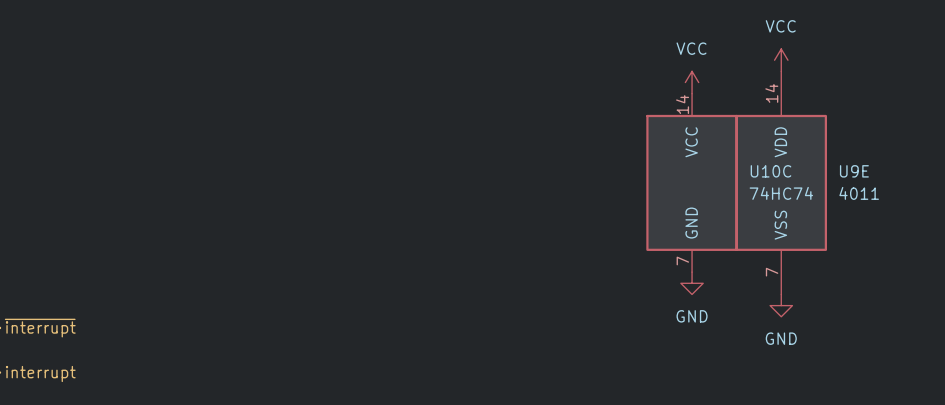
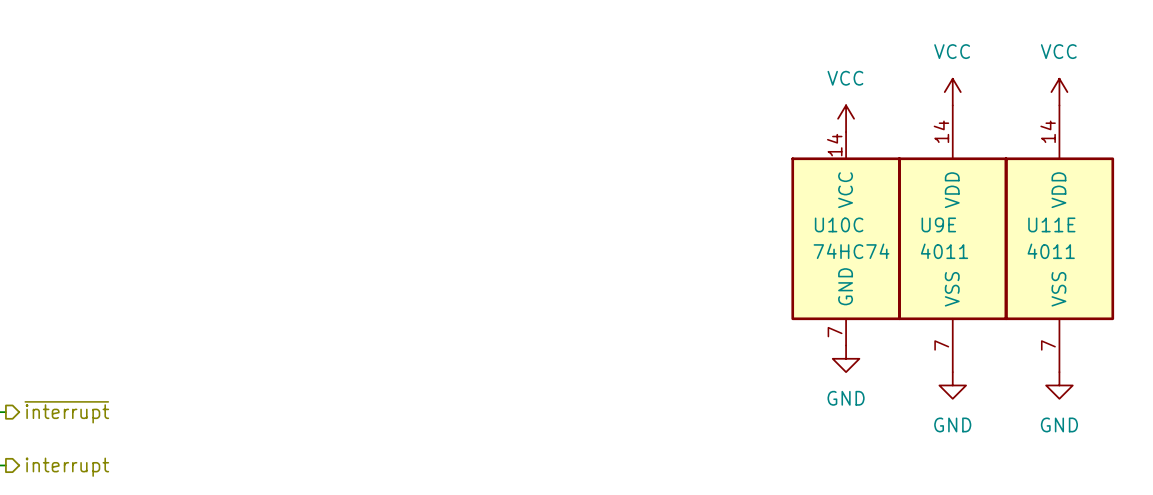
power symbol: none -> VCC (1059, 92)
U10C name position: U10C (771, 171) -> U10C (839, 224)
U9E name position: U9E (854, 171) -> U9E (938, 224)
U11E: none -> 4011 (1059, 238)
U10C value position: 74HC74 (781, 193) -> 74HC74 (851, 251)
U9E value position: 4011 (859, 193) -> 4011 (944, 251)
power symbol: none -> GND (1059, 385)

